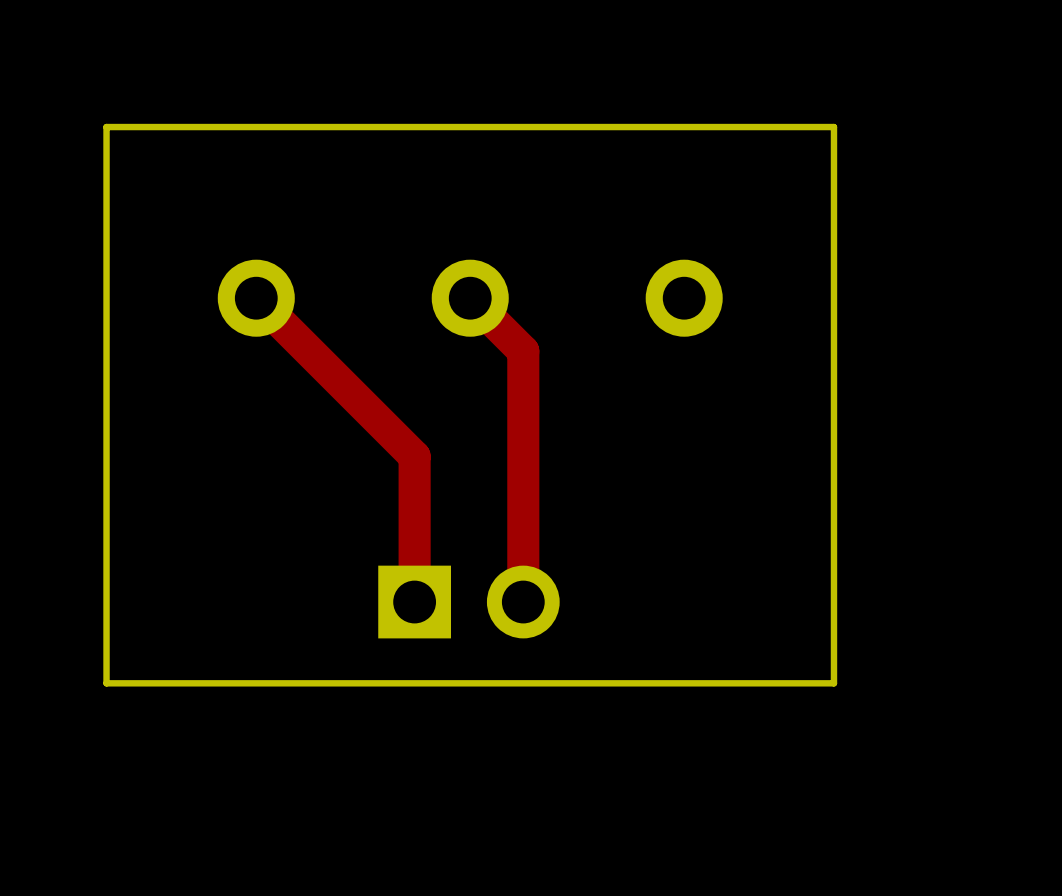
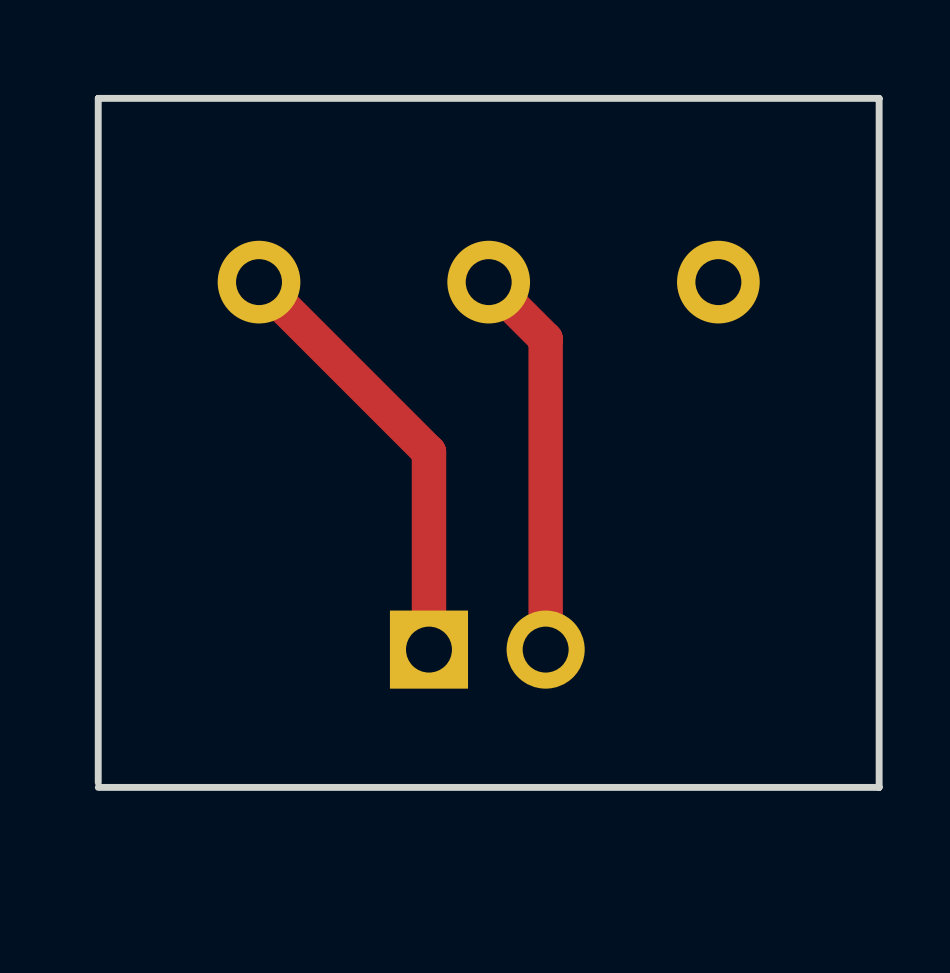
part position: (468, 602) -> (487, 649)
board edge: (106, 683) (833, 683) -> (98, 787) (879, 787) (879, 695)
board edge: none -> (98, 695) (98, 782)

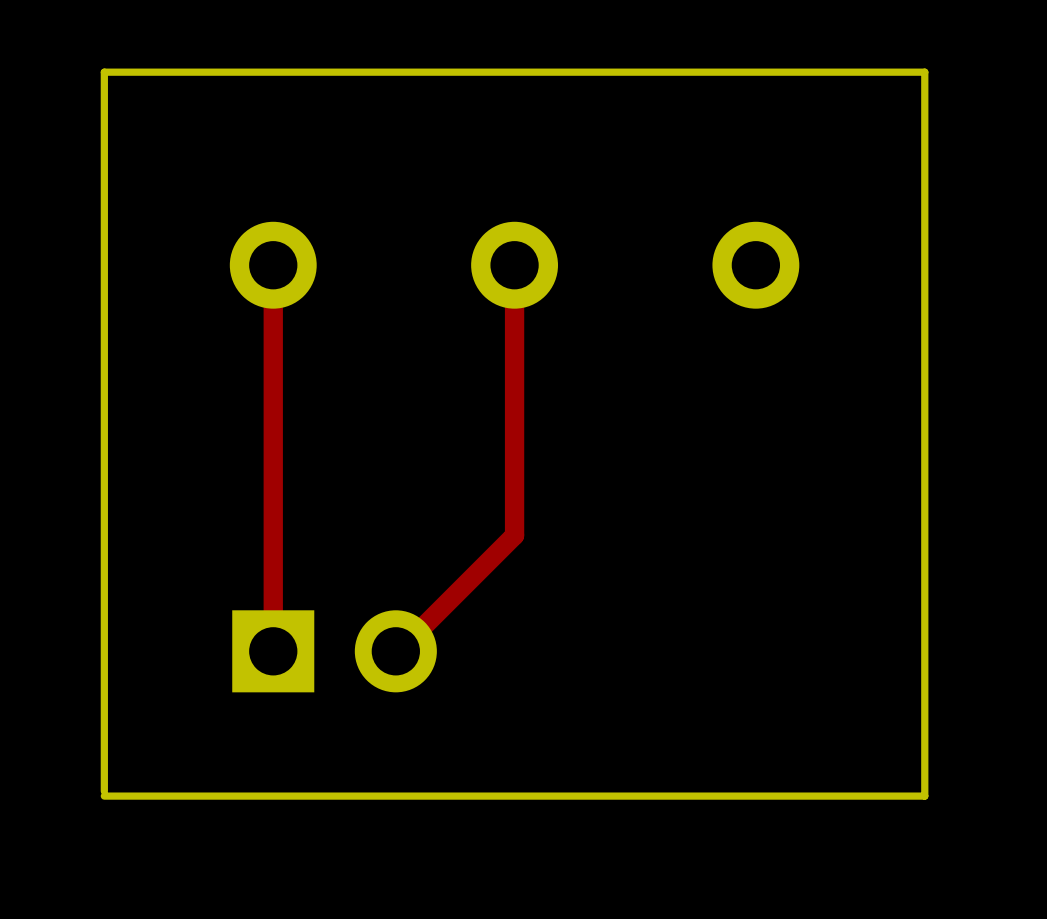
track: (259, 282) (428, 452) (428, 649) -> (273, 265) (273, 651)
track: (488, 282) (545, 339) (545, 649) -> (514, 265) (514, 535) (398, 651) (395, 651)
part position: (487, 649) -> (334, 651)

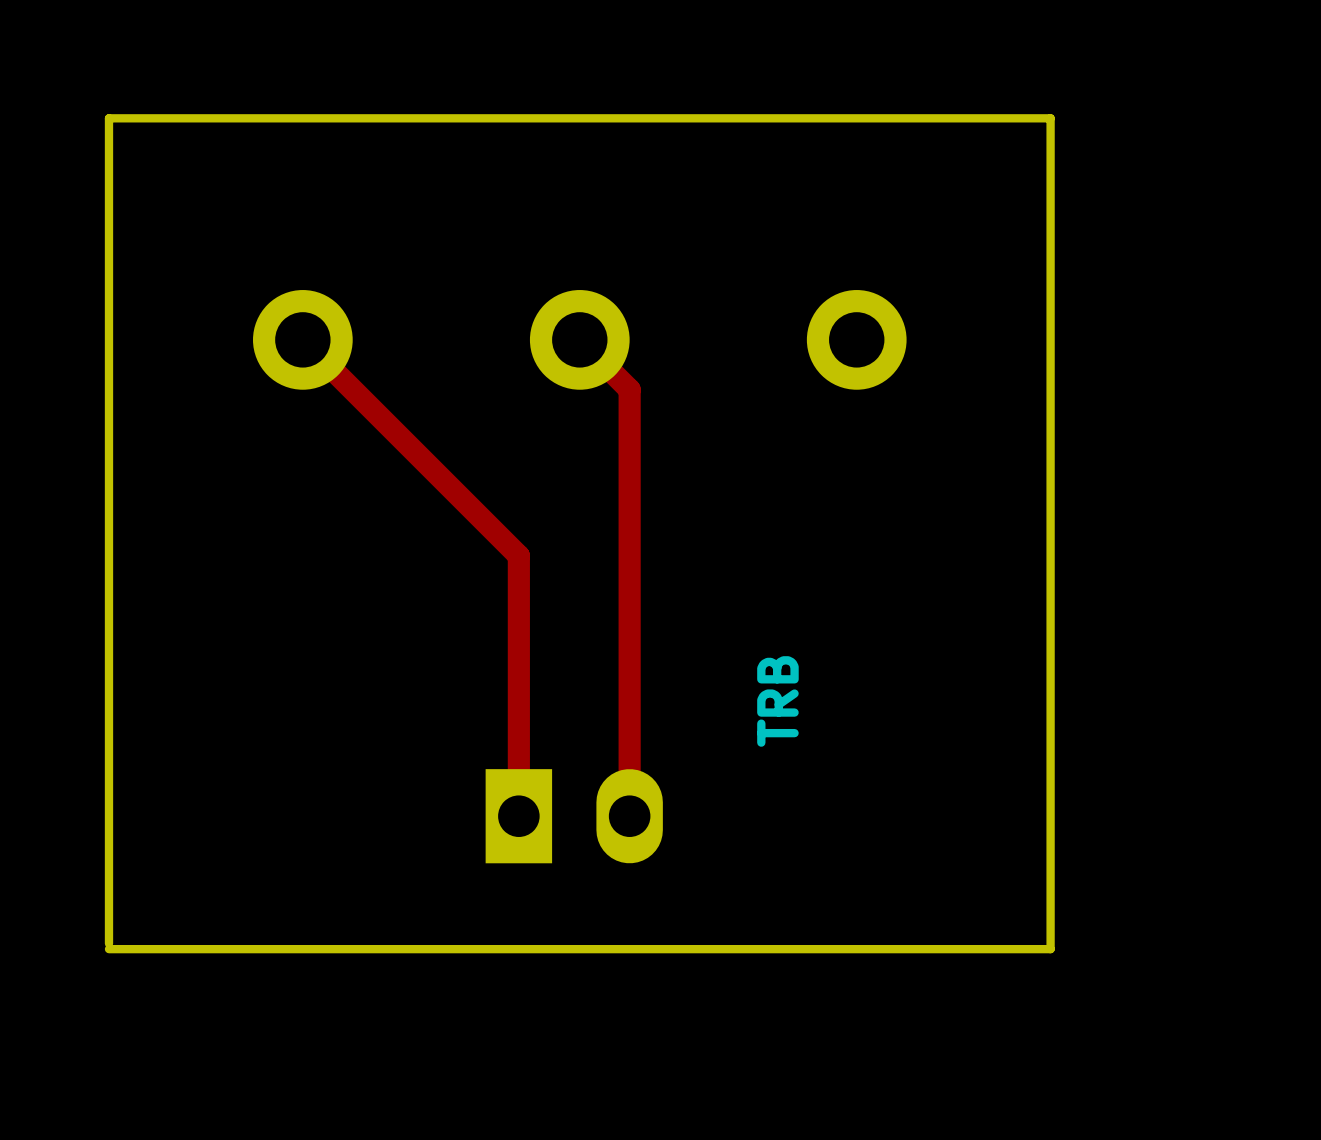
track: (273, 265) (273, 651) -> (302, 339) (518, 555) (518, 816)
track: (514, 265) (514, 535) (398, 651) (395, 651) -> (579, 339) (629, 389) (629, 816)
text: none -> TRB (777, 701)
part: (334, 651) -> none
part: none -> (574, 816)

